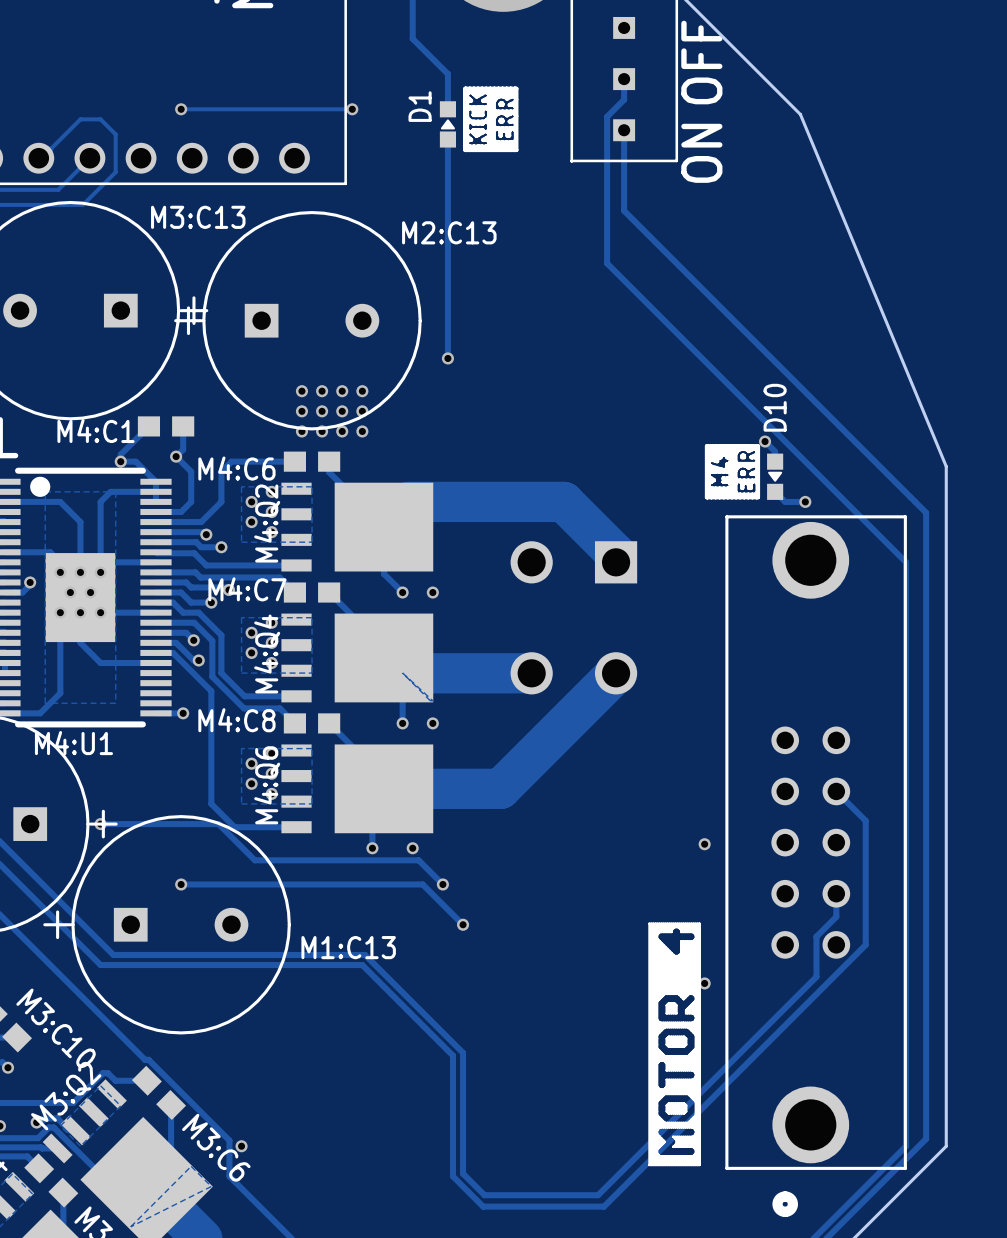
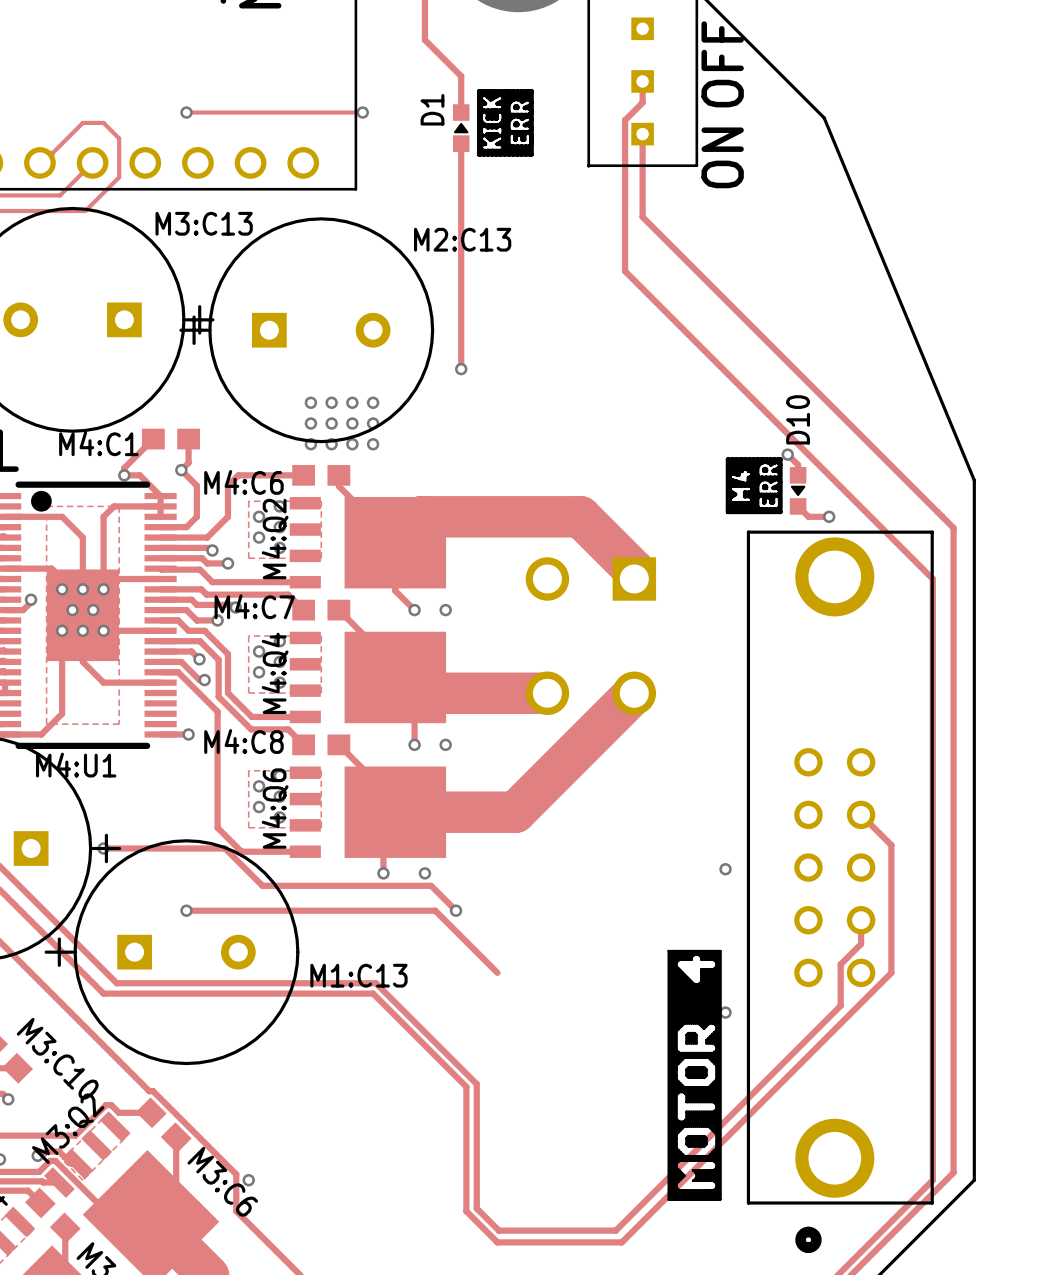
track: none -> (476, 952) (497, 972)
via: (463, 924) -> none

